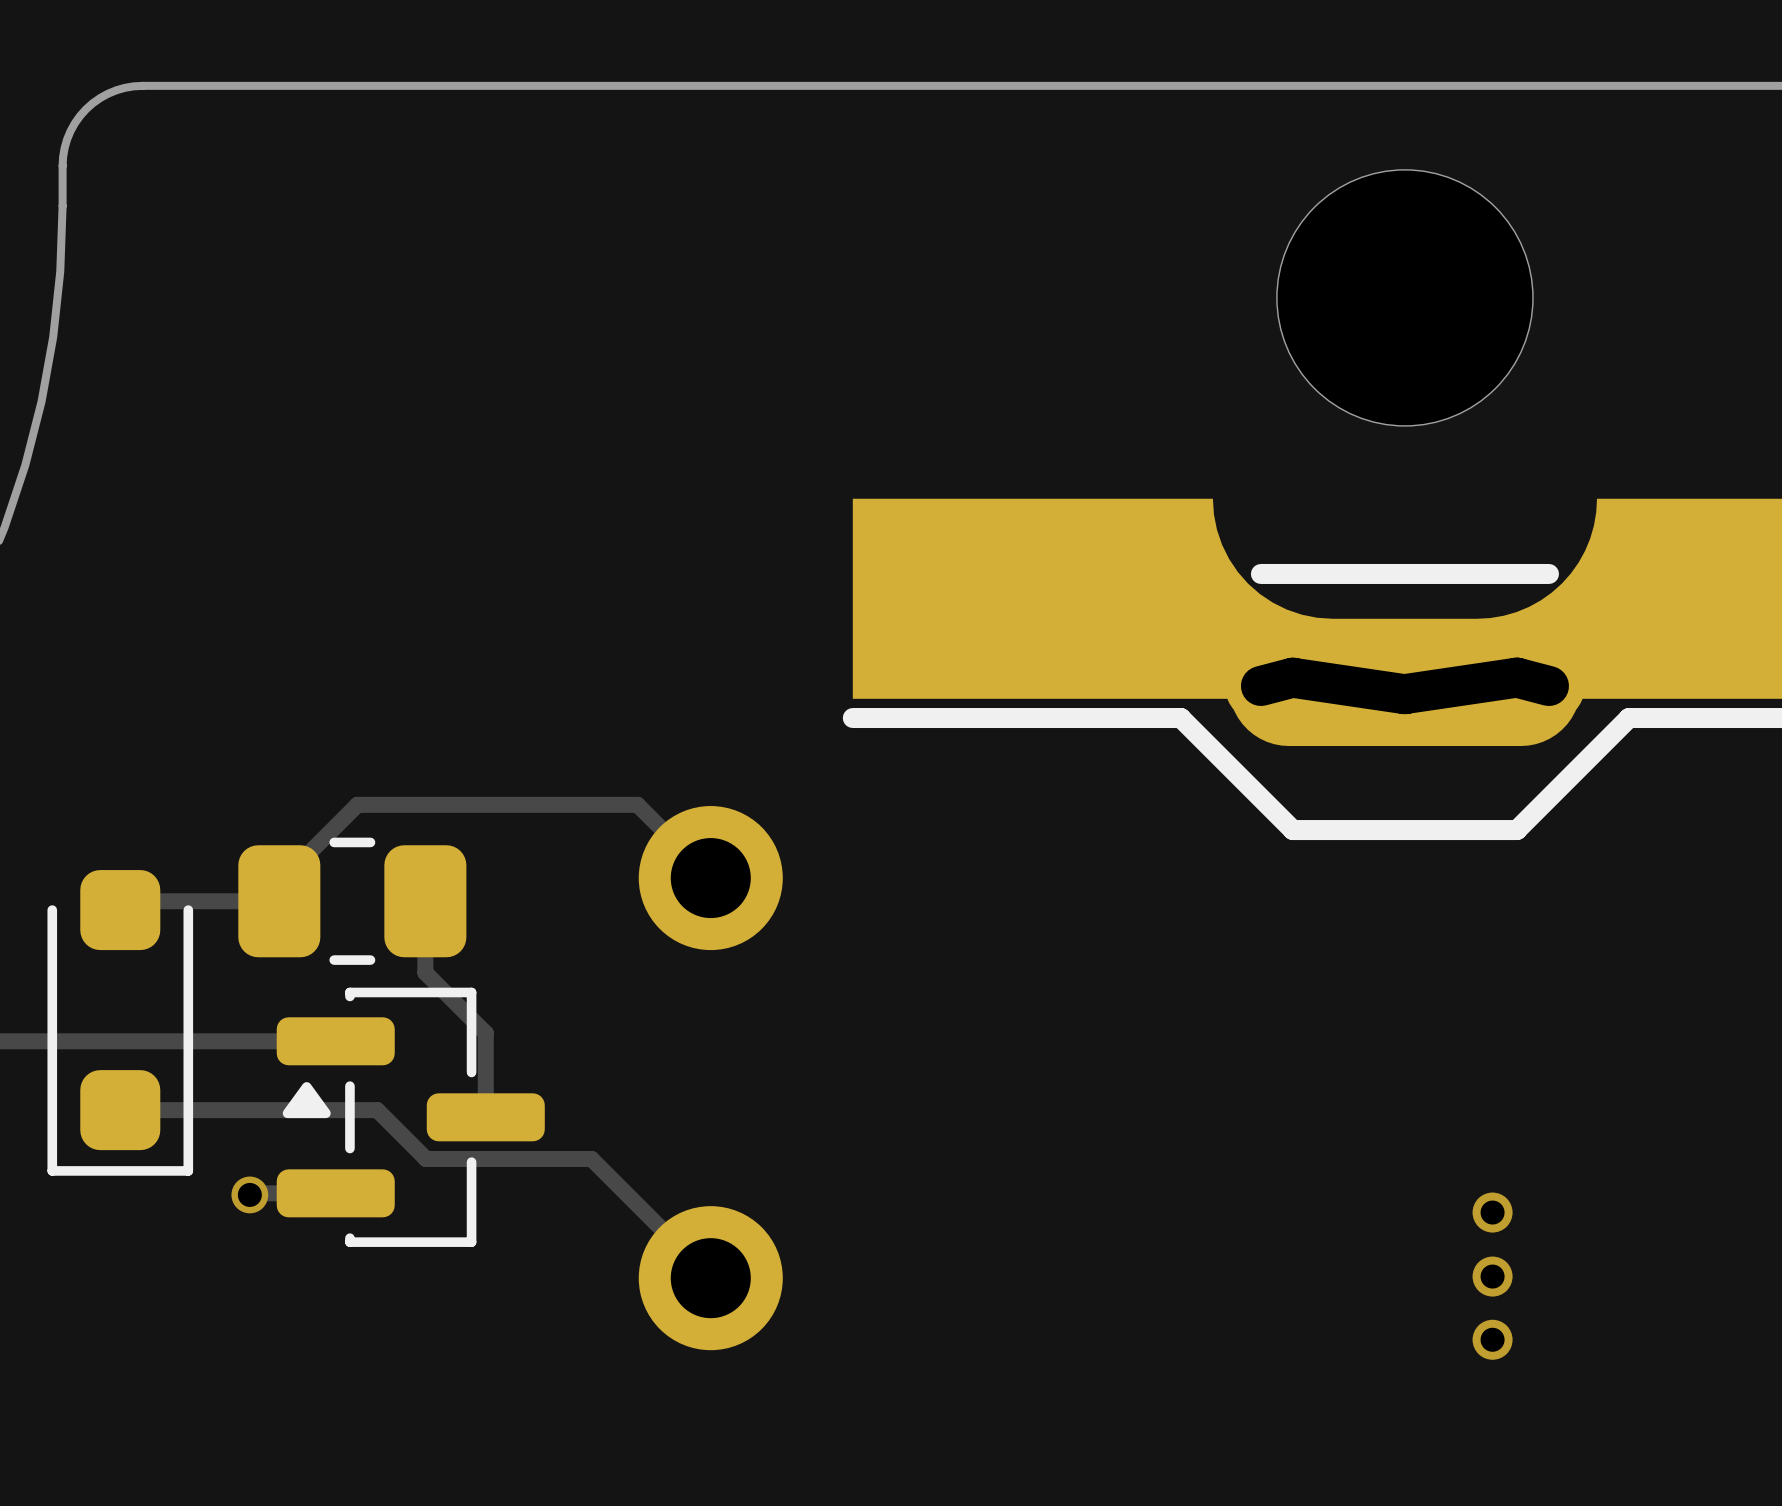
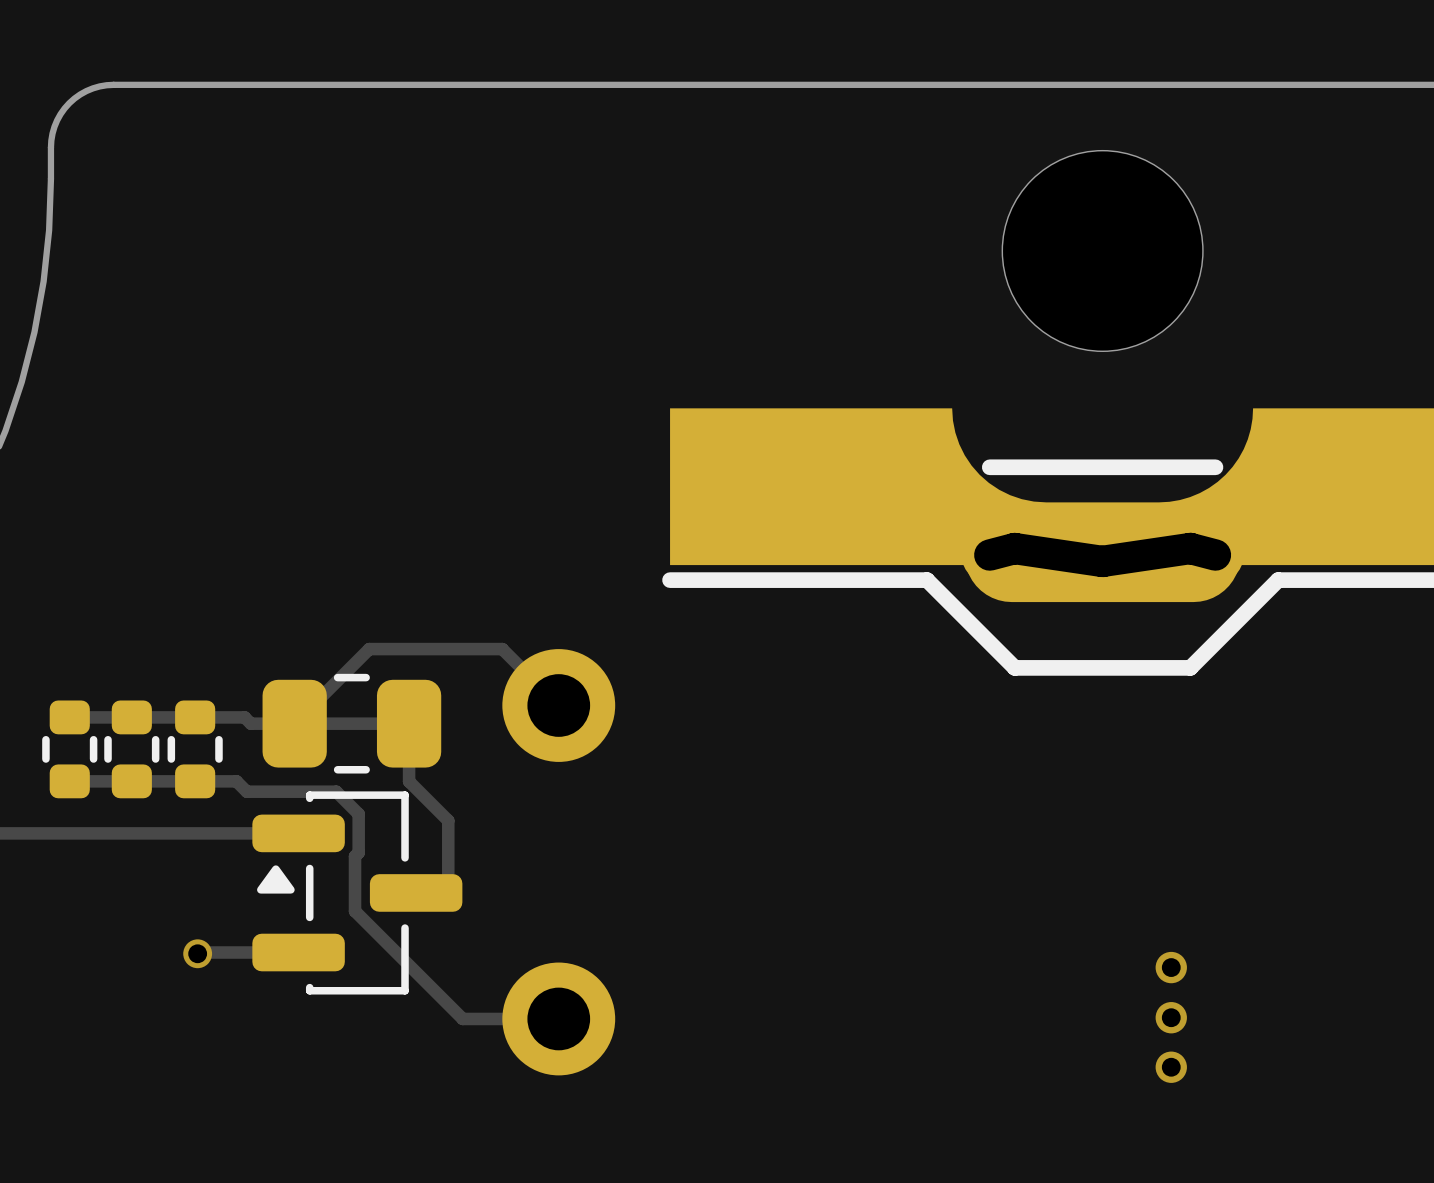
track: (638, 806) (357, 804) (279, 882) -> (502, 649) (369, 649) (294, 723) (250, 723) (244, 717) (69, 717)
track: (279, 901) (129, 901) -> none
part: (352, 901) -> none
track: (425, 901) (425, 972) (485, 1033) (485, 1117) -> none
part: none -> (351, 723)
track: none -> (409, 723) (409, 781) (448, 820) (448, 892)
part: none -> (69, 749)
part: none -> (131, 749)
part: none -> (195, 749)
part: (120, 1022) -> none
track: (120, 1110) (377, 1110) (426, 1159) (591, 1159) (710, 1278) -> (69, 781) (236, 781) (246, 791) (336, 791) (358, 814) (358, 852) (355, 856) (355, 911) (462, 1018) (558, 1018)
part position: (410, 1117) -> (357, 892)

